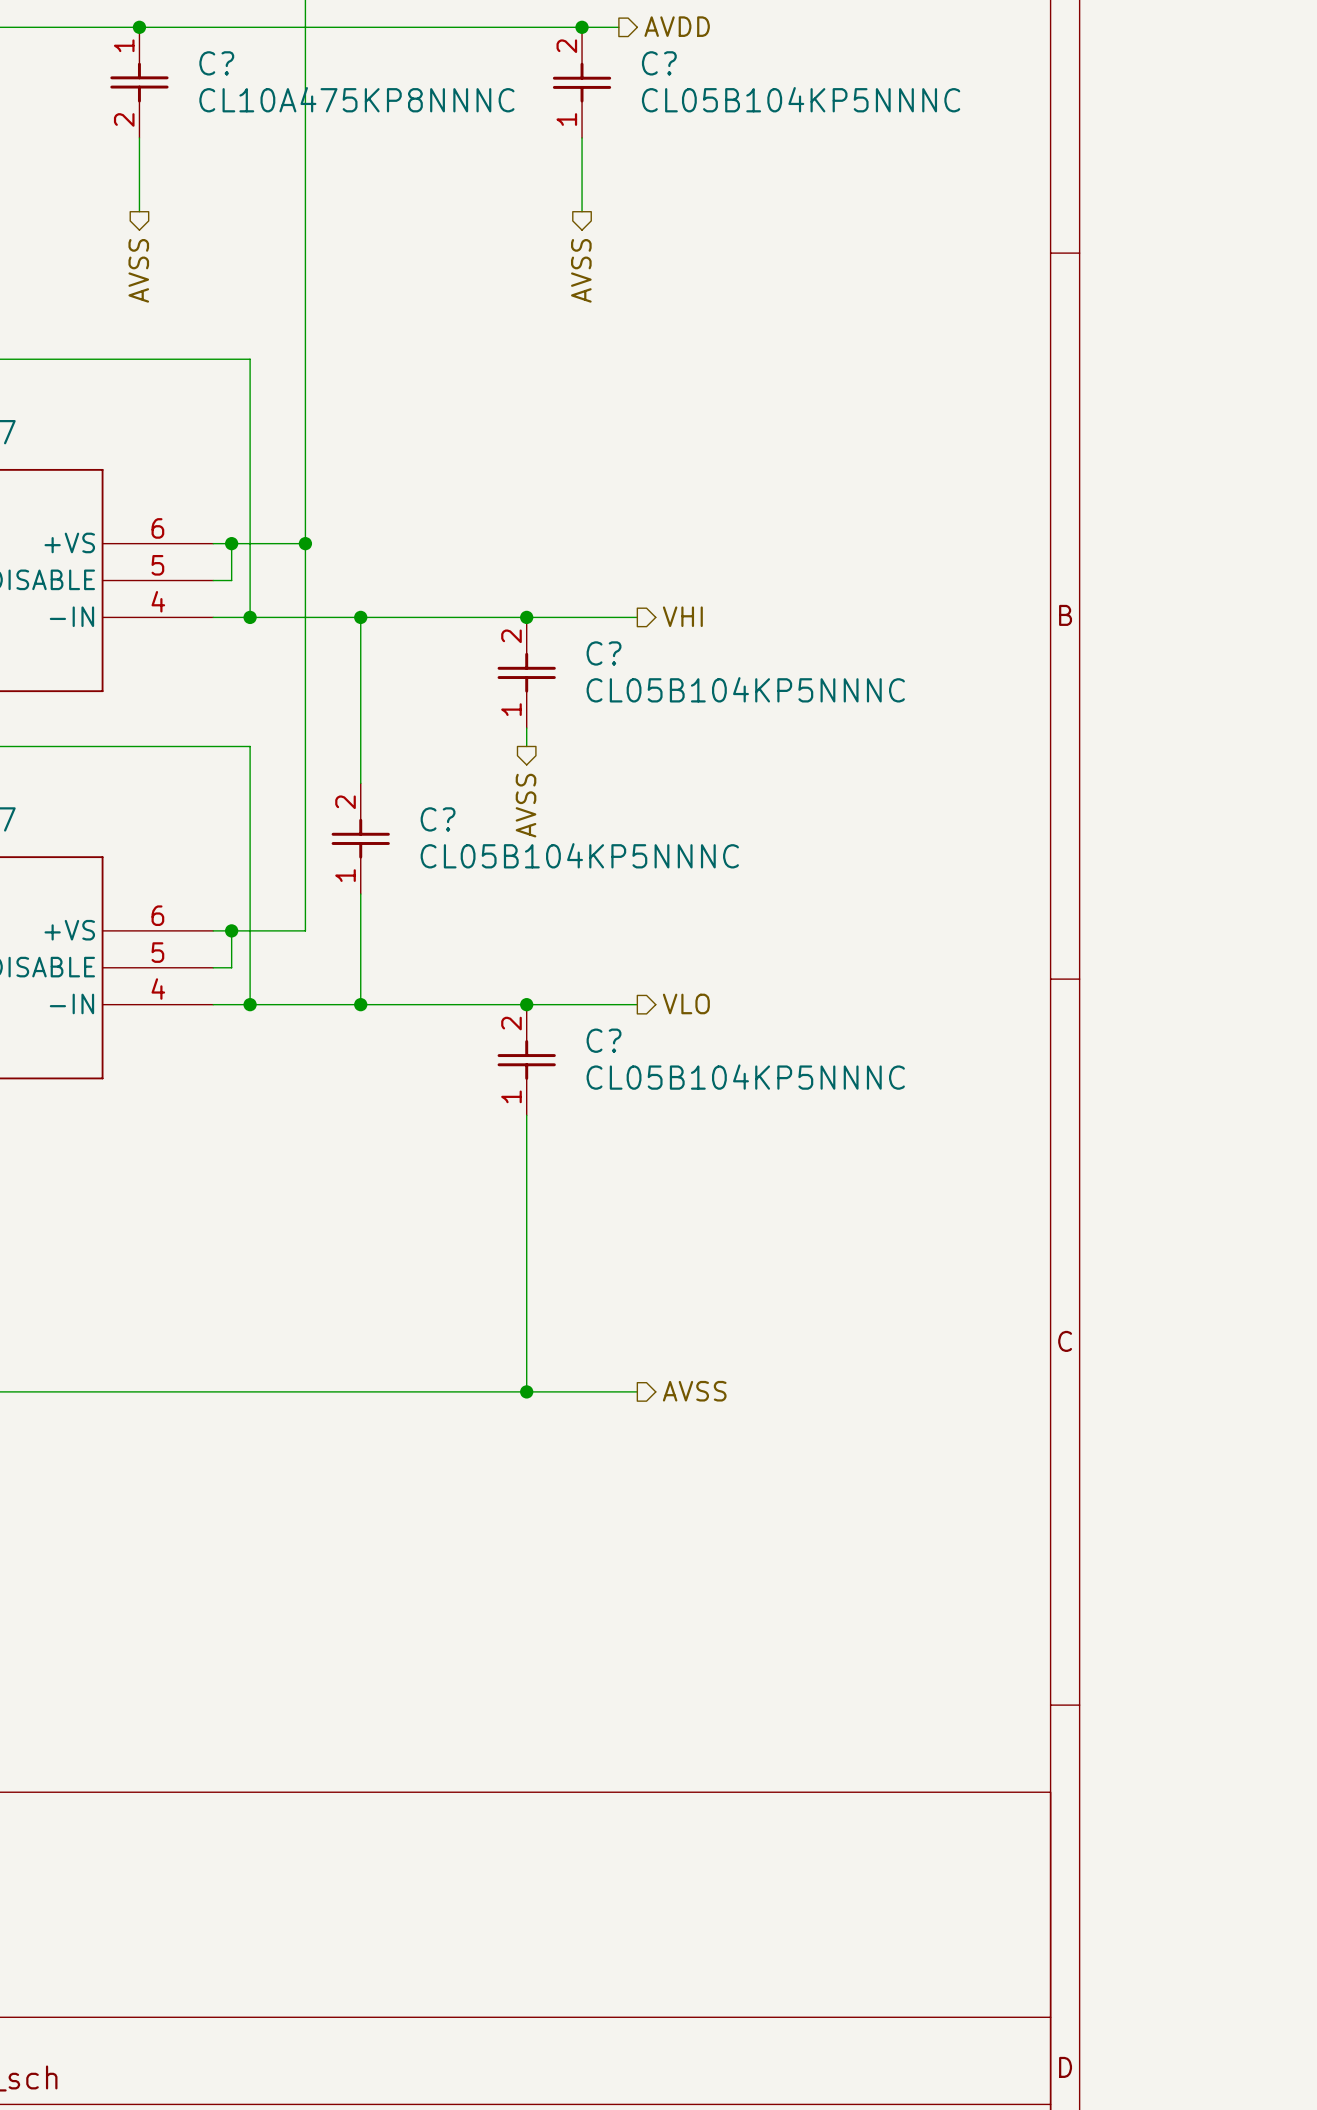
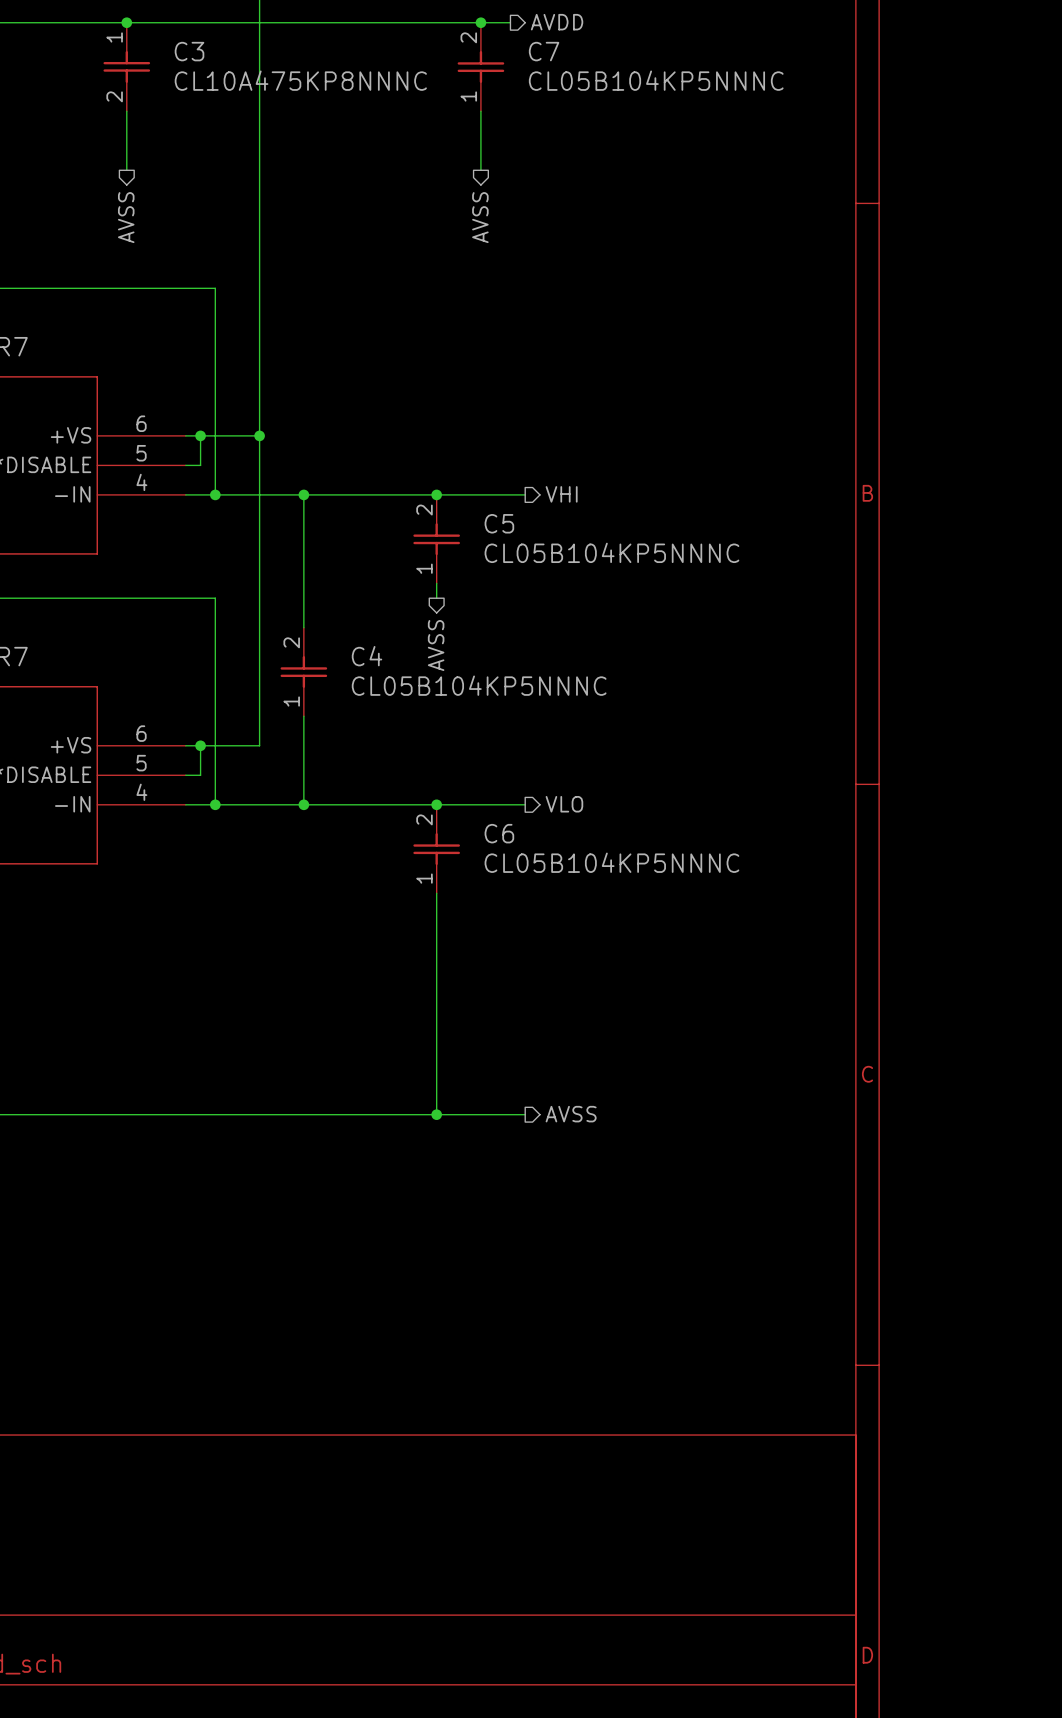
C? name: C? (216, 63) -> C3 (189, 51)
C? name: C? (659, 63) -> C7 (544, 51)
C? name: C? (604, 653) -> C5 (499, 523)
C? name: C? (438, 819) -> C4 (367, 656)
C? name: C? (604, 1040) -> C6 (499, 833)

